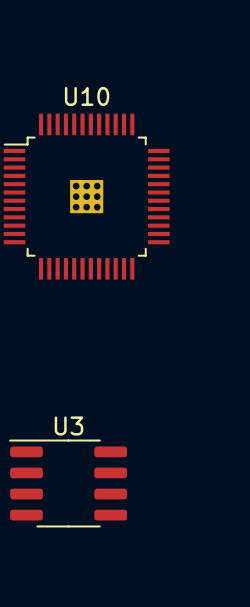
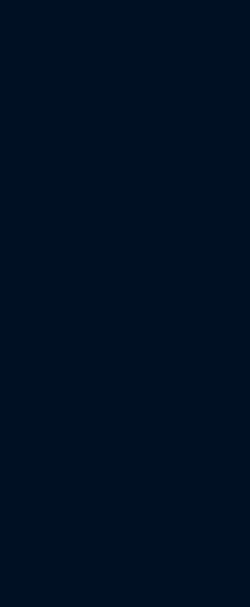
U10: (86, 196) -> none
U3: (68, 483) -> none

